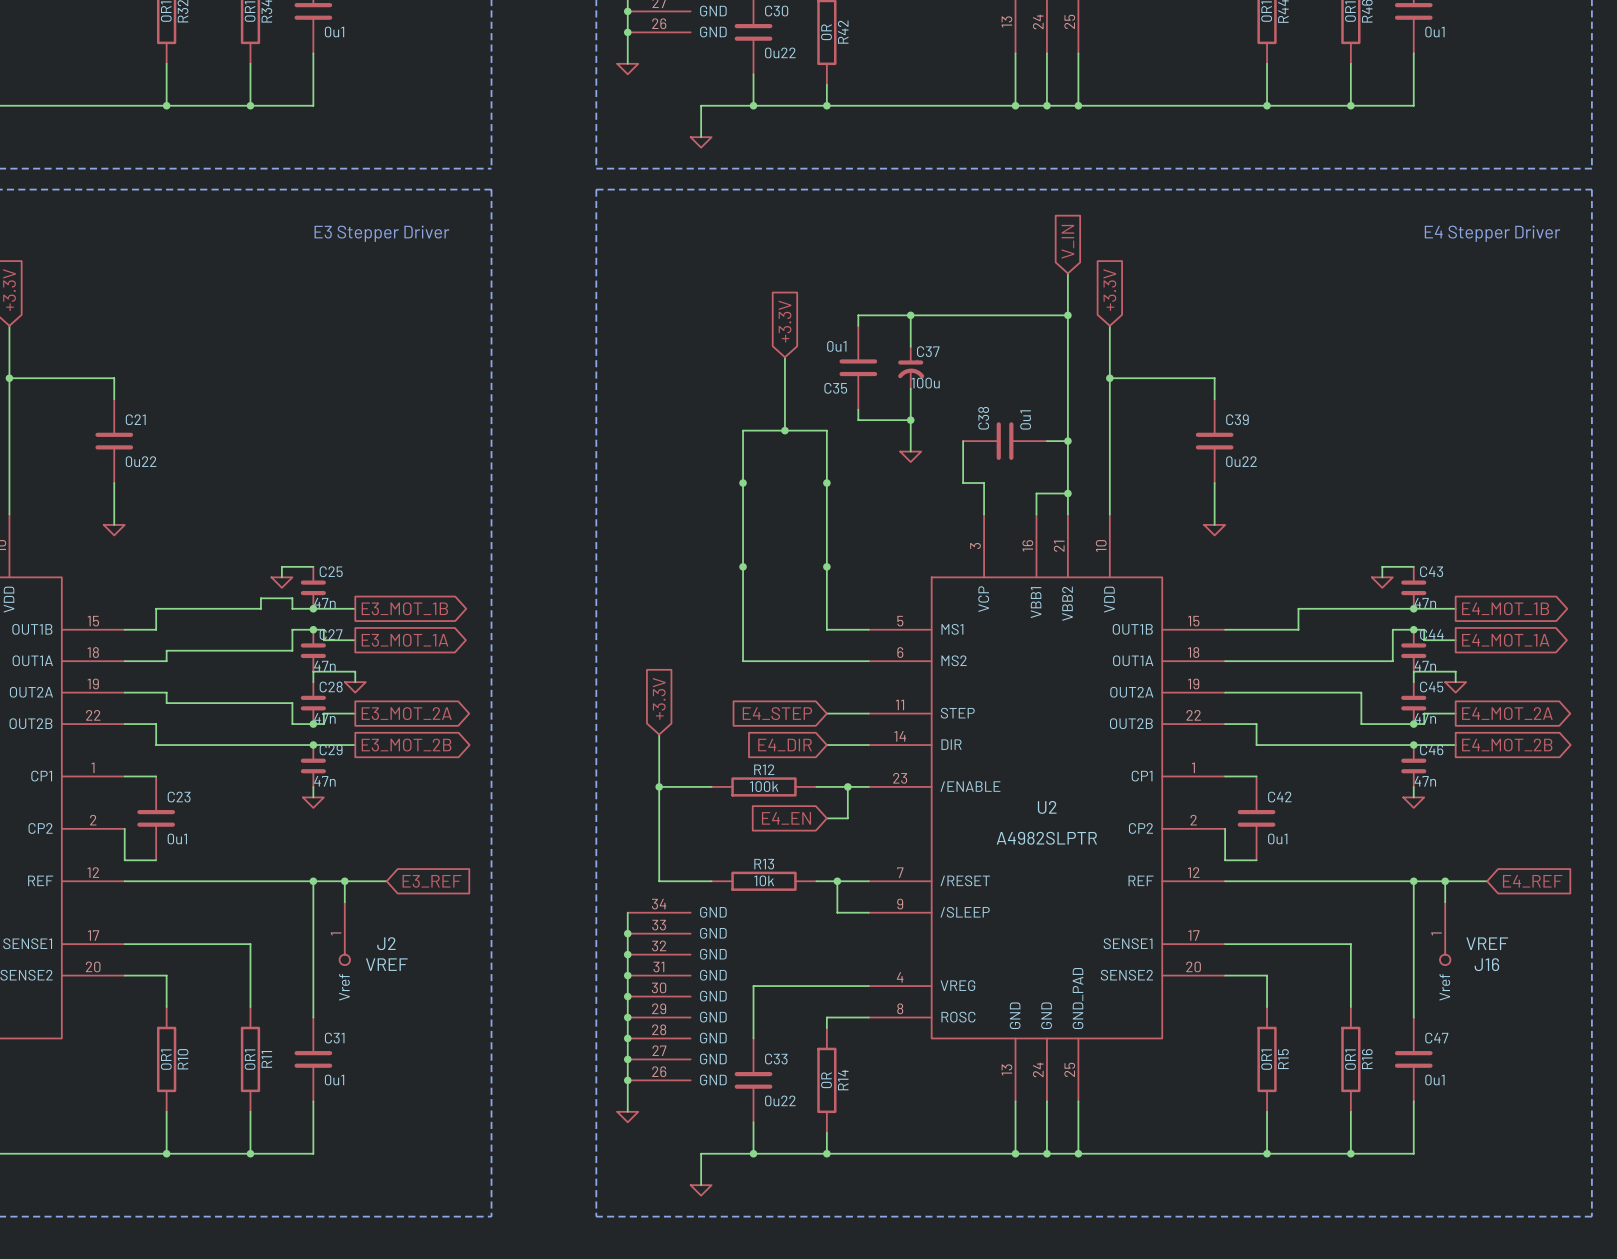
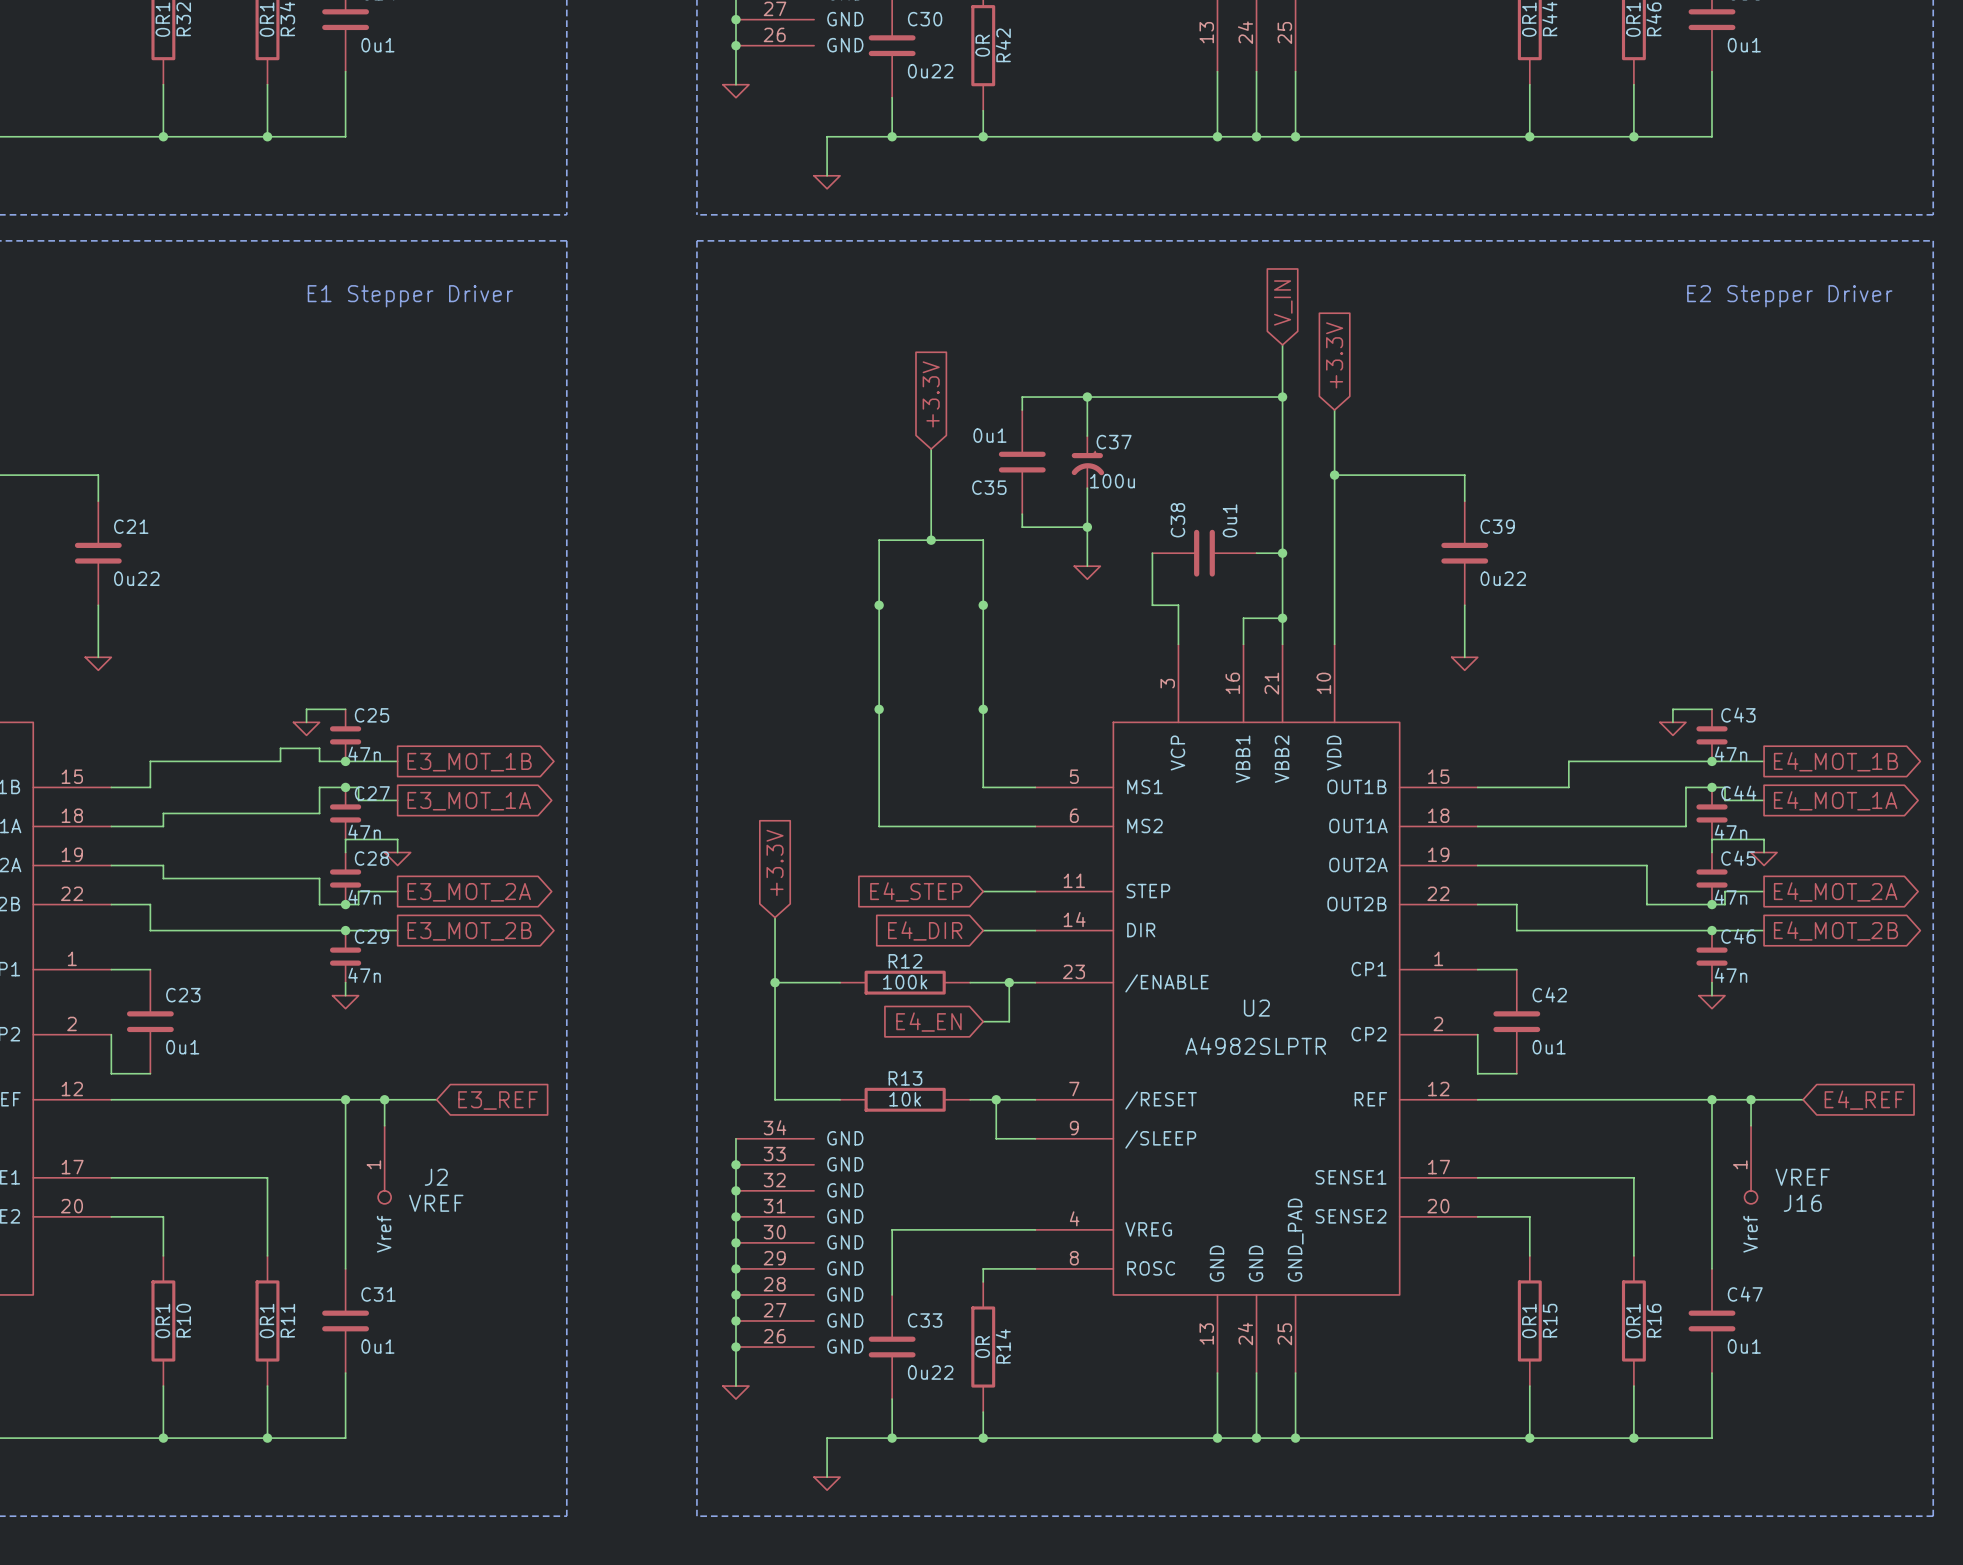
text: E3 Stepper Driver (381, 233) -> E1 Stepper Driver (410, 296)
text: E4 Stepper Driver (1492, 233) -> E2 Stepper Driver (1789, 296)

